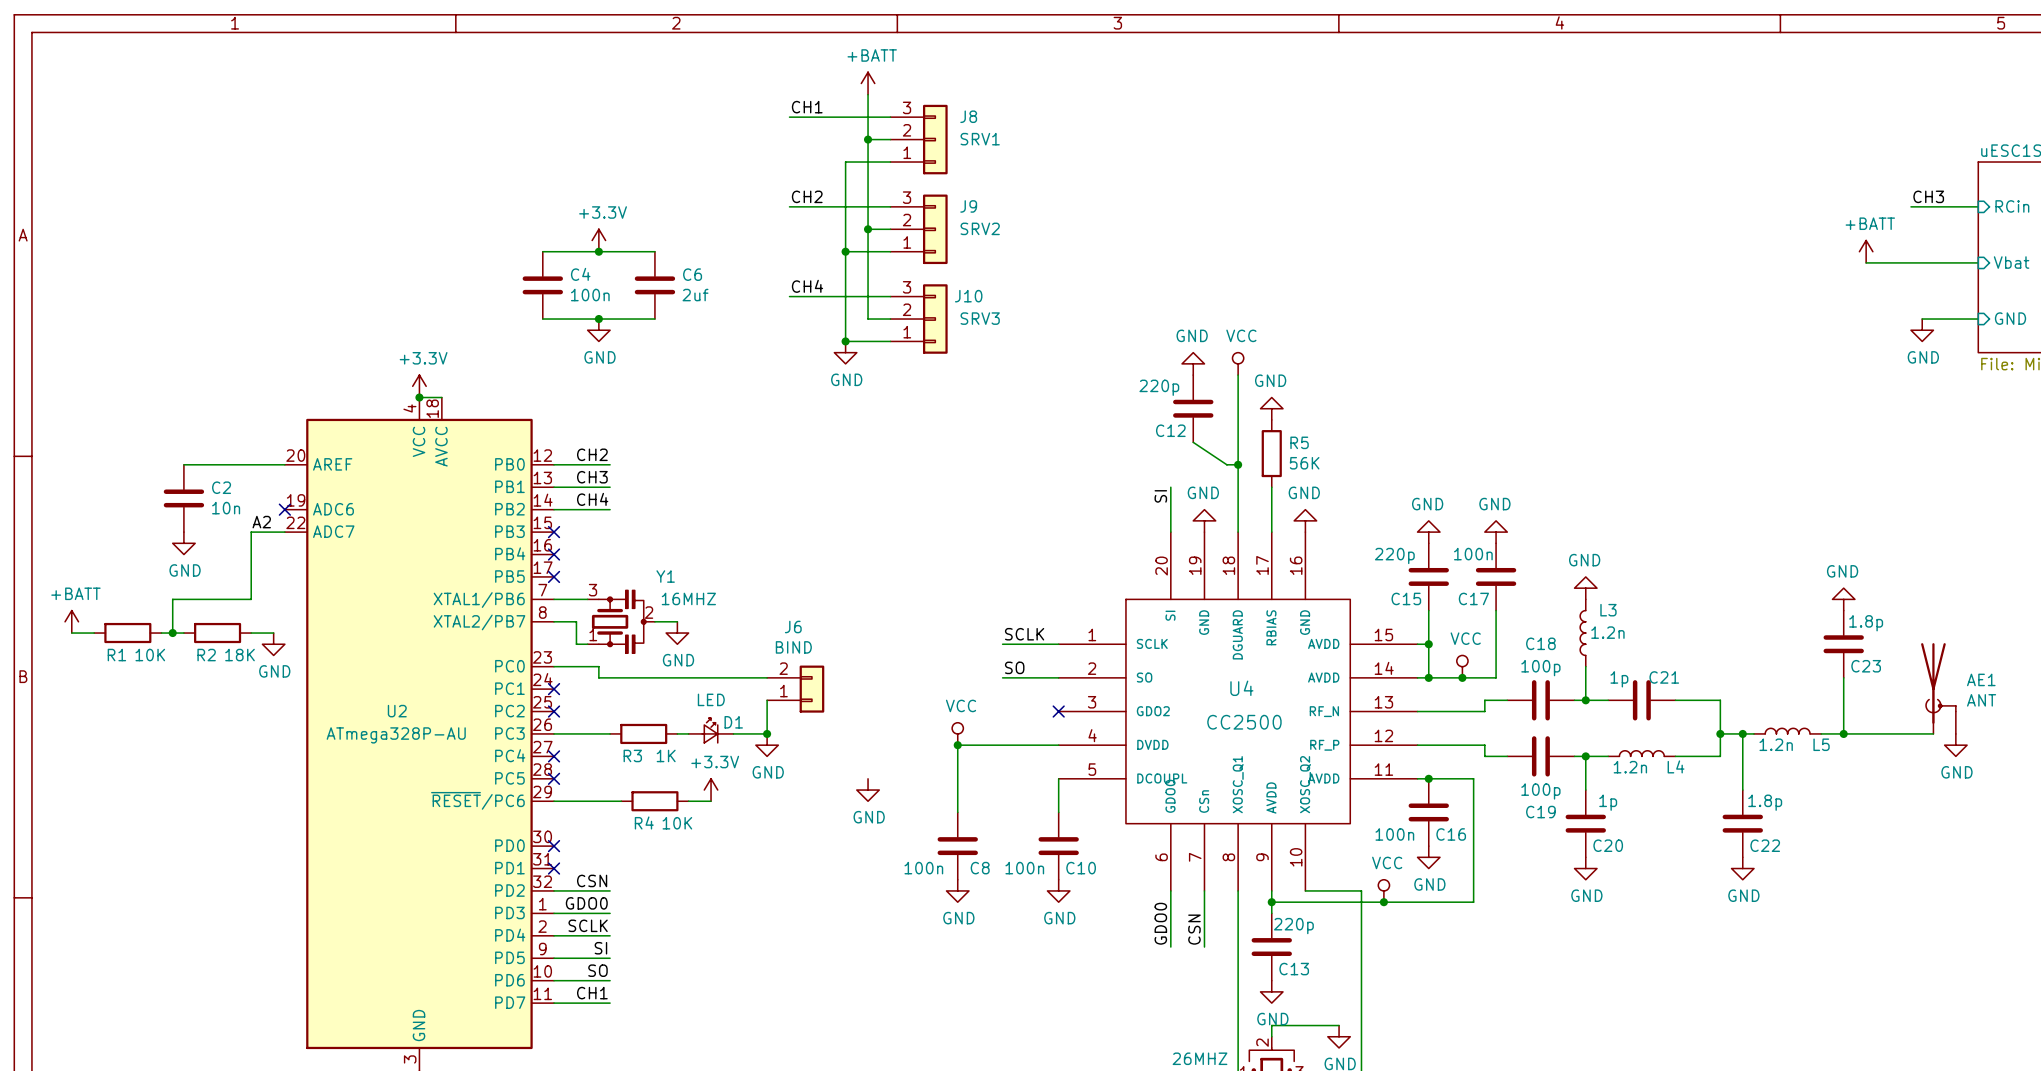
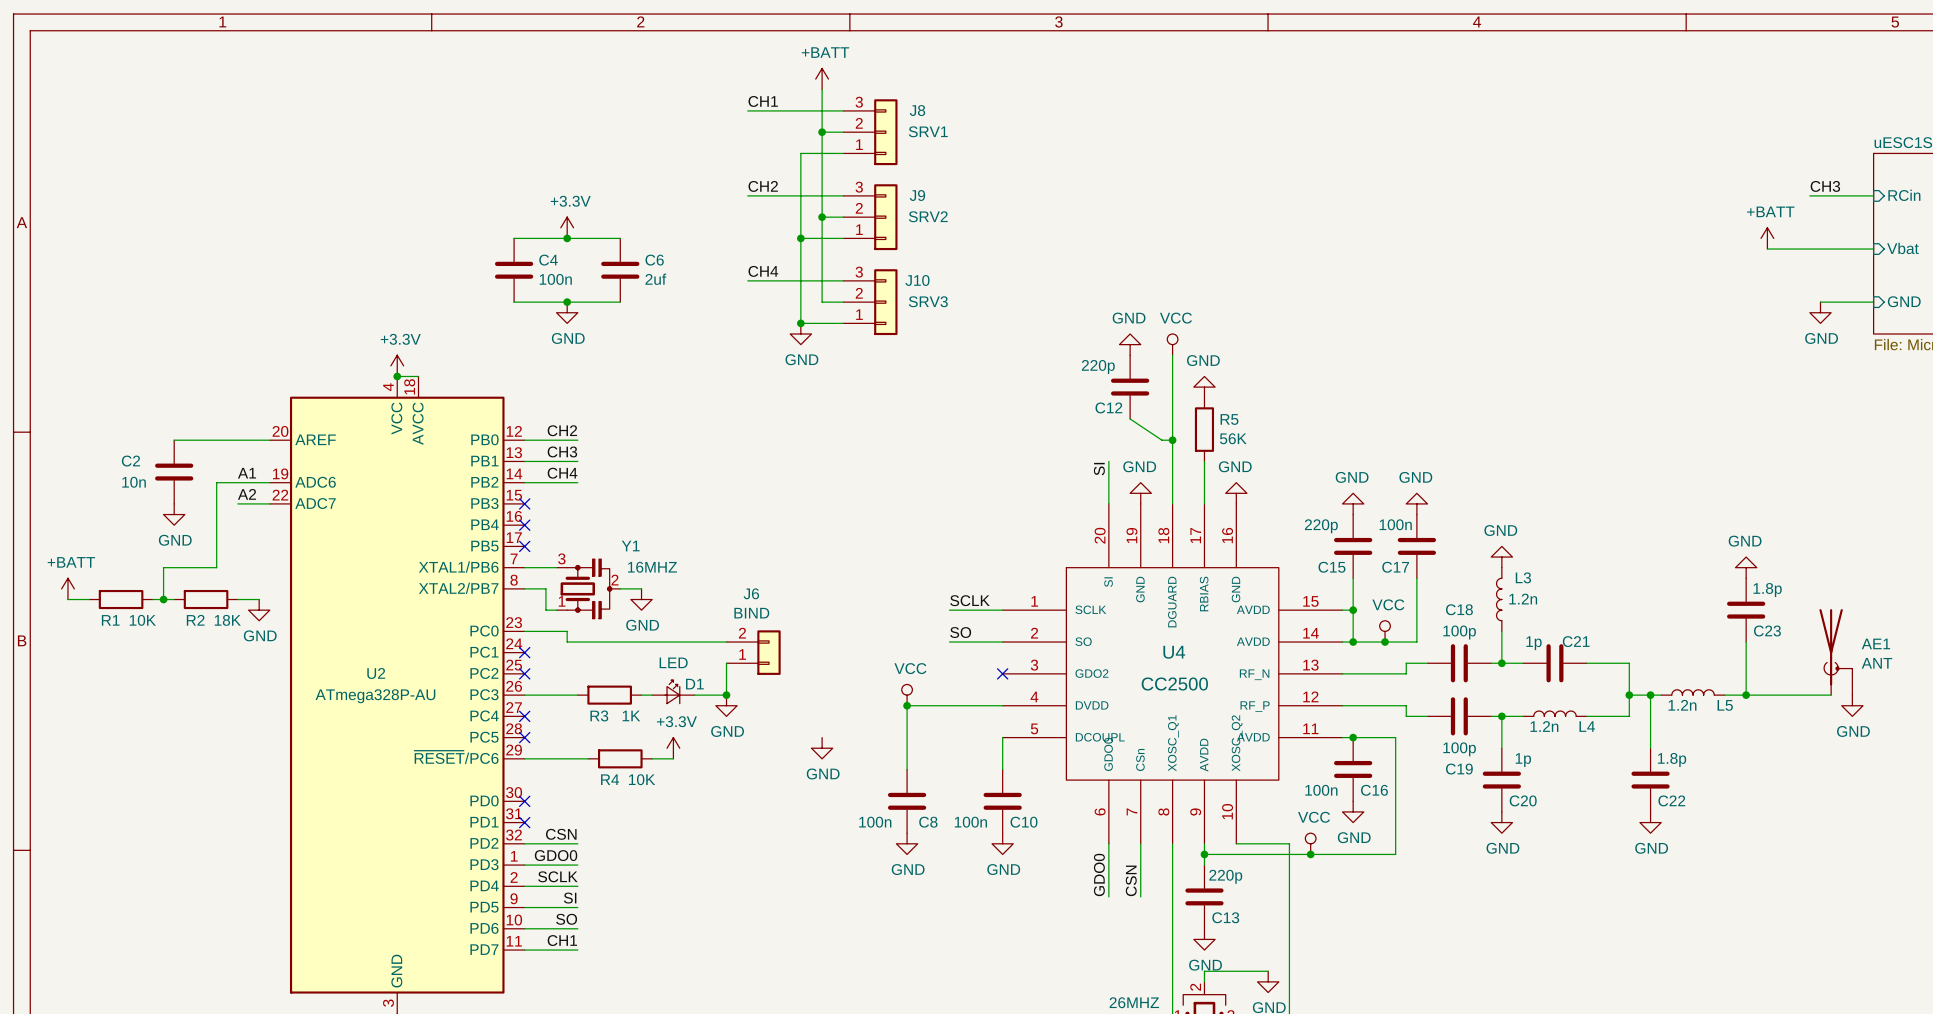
C2 name position: C2 (221, 487) -> C2 (130, 461)
label: none -> A1 (247, 473)
C2 value position: 10n (226, 508) -> 10n (134, 482)
no-connect mark: (284, 509) -> none
wire: (251, 532) (251, 599) (228, 599) -> (269, 482) (216, 482) (216, 567)

